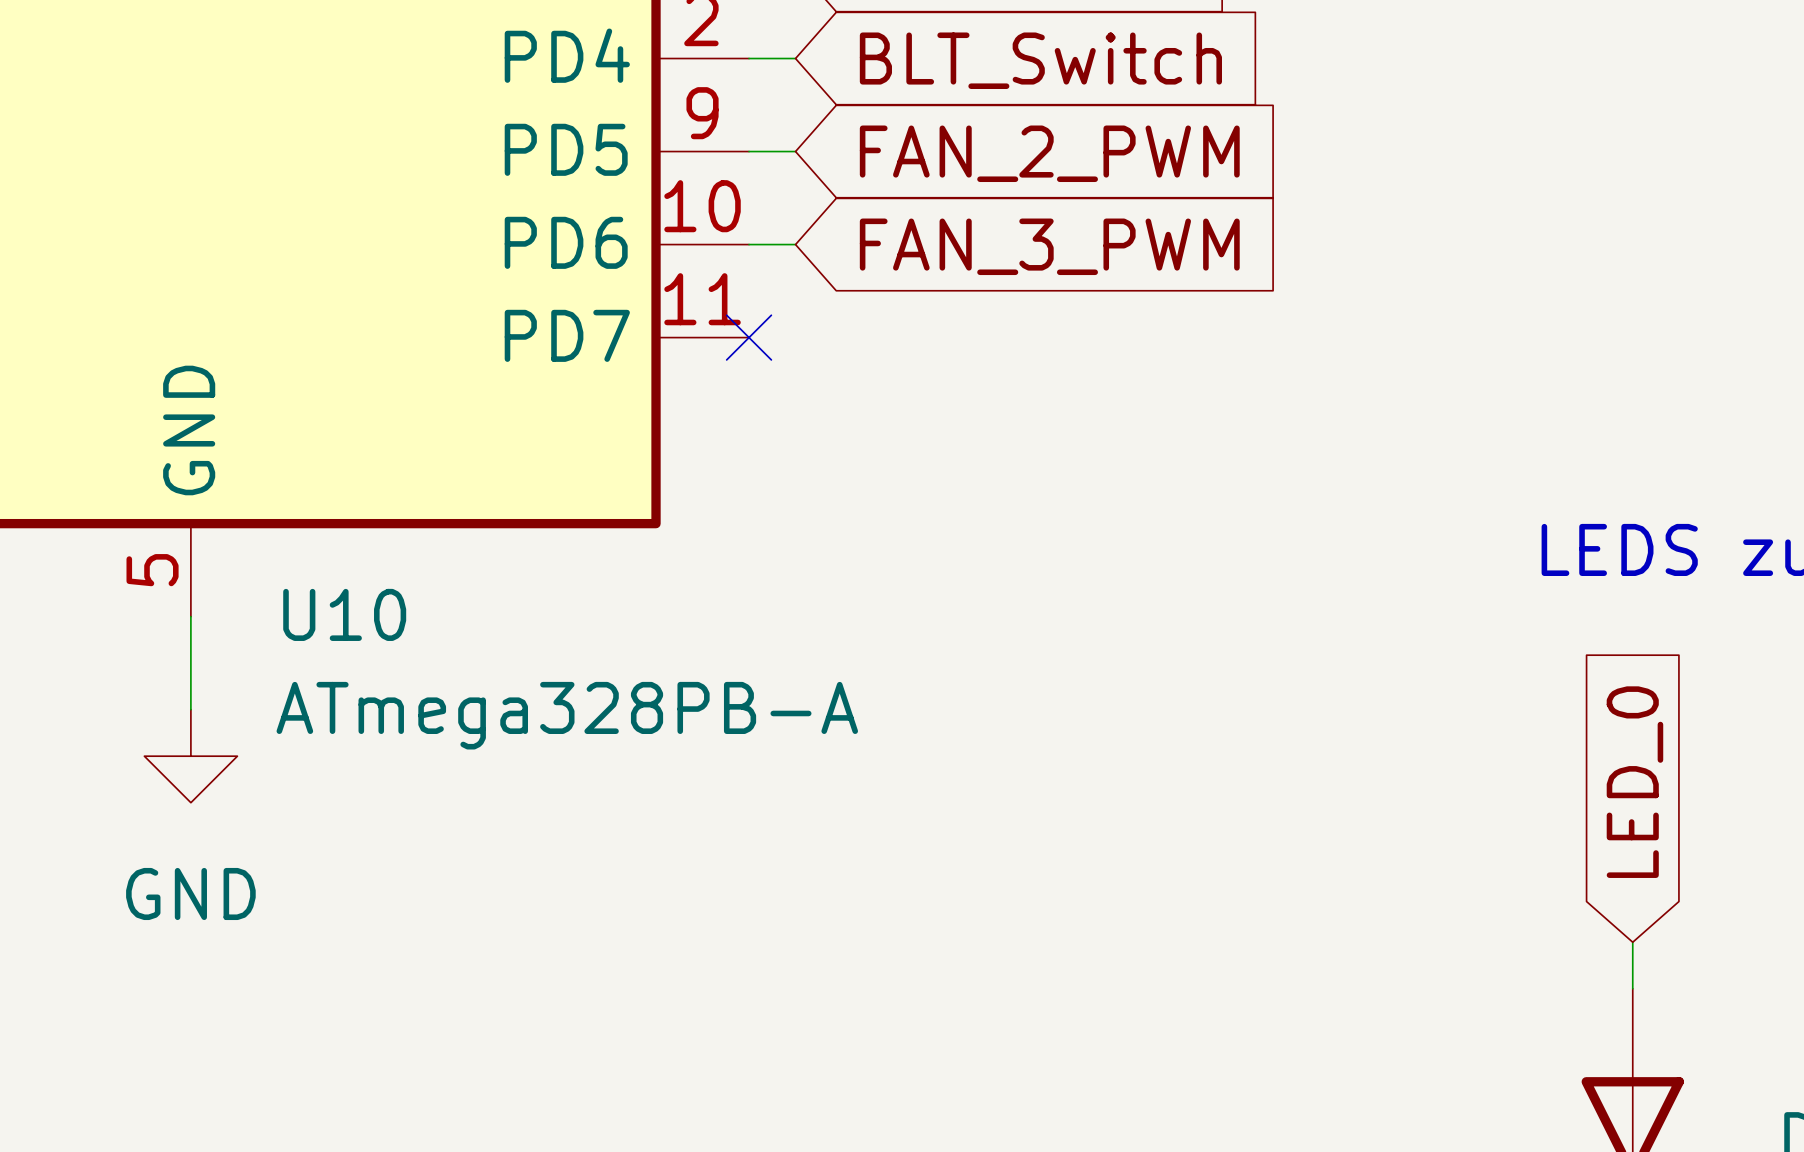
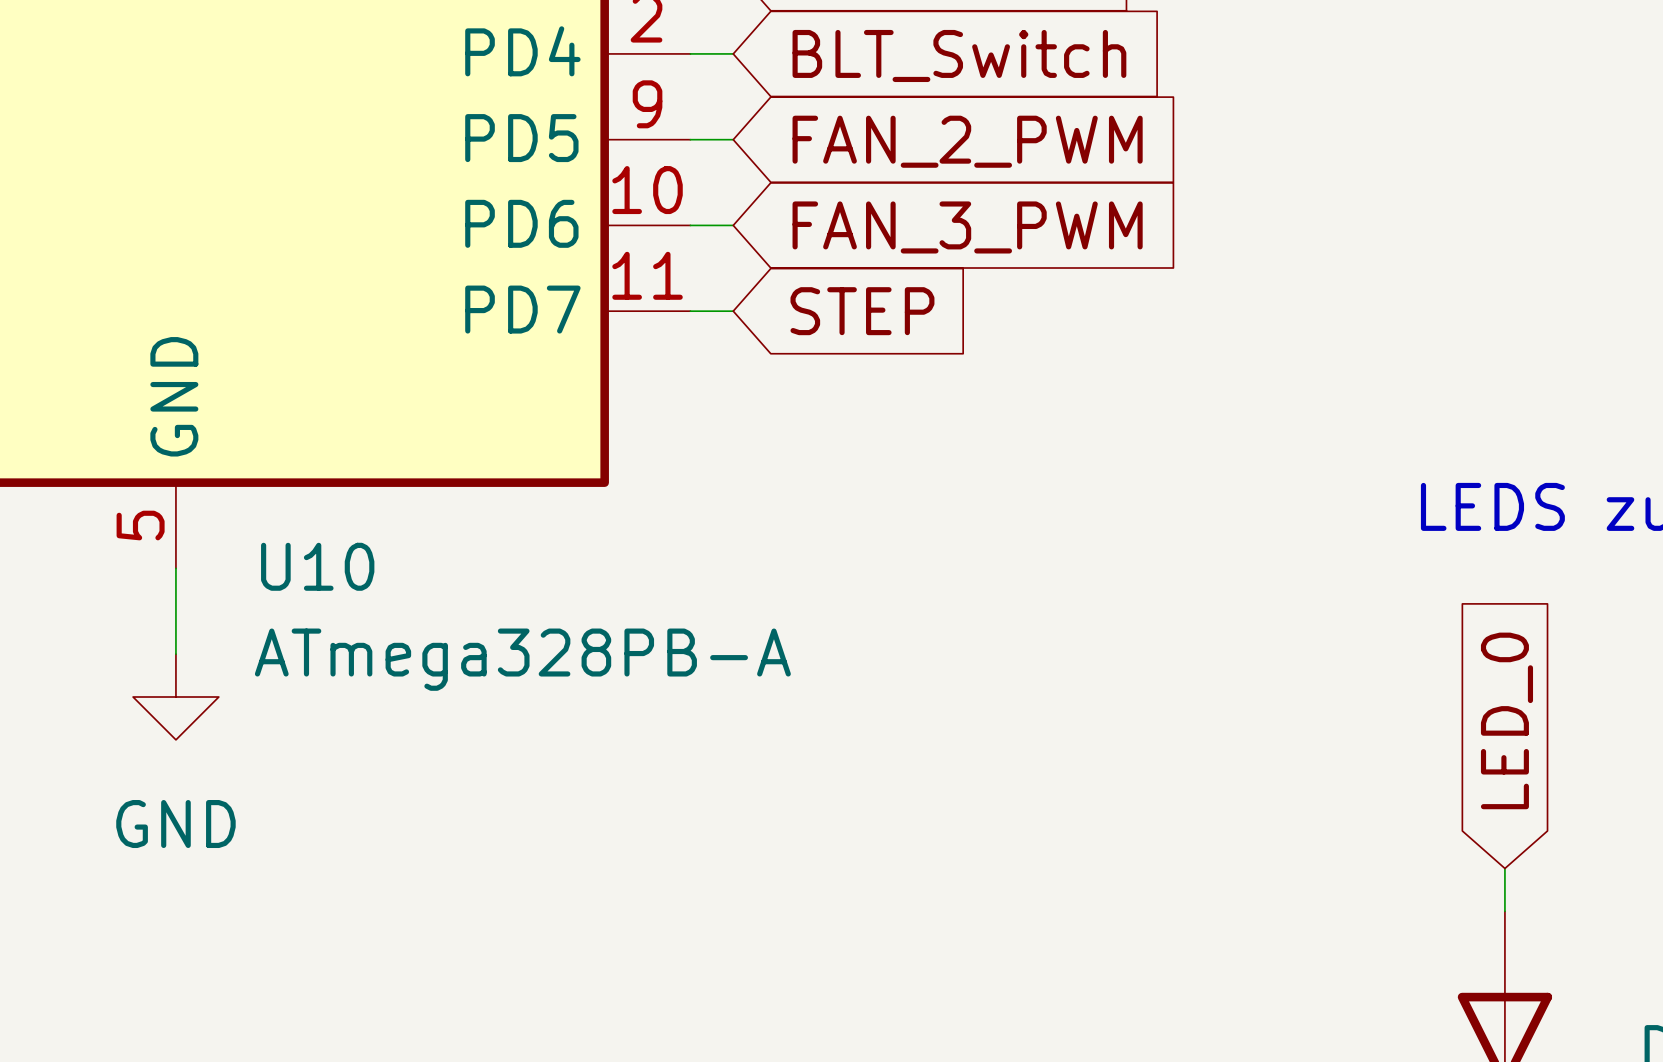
wire: none -> (690, 311) (733, 311)
no-connect mark: (749, 337) -> none
global label: none -> STEP (862, 311)

